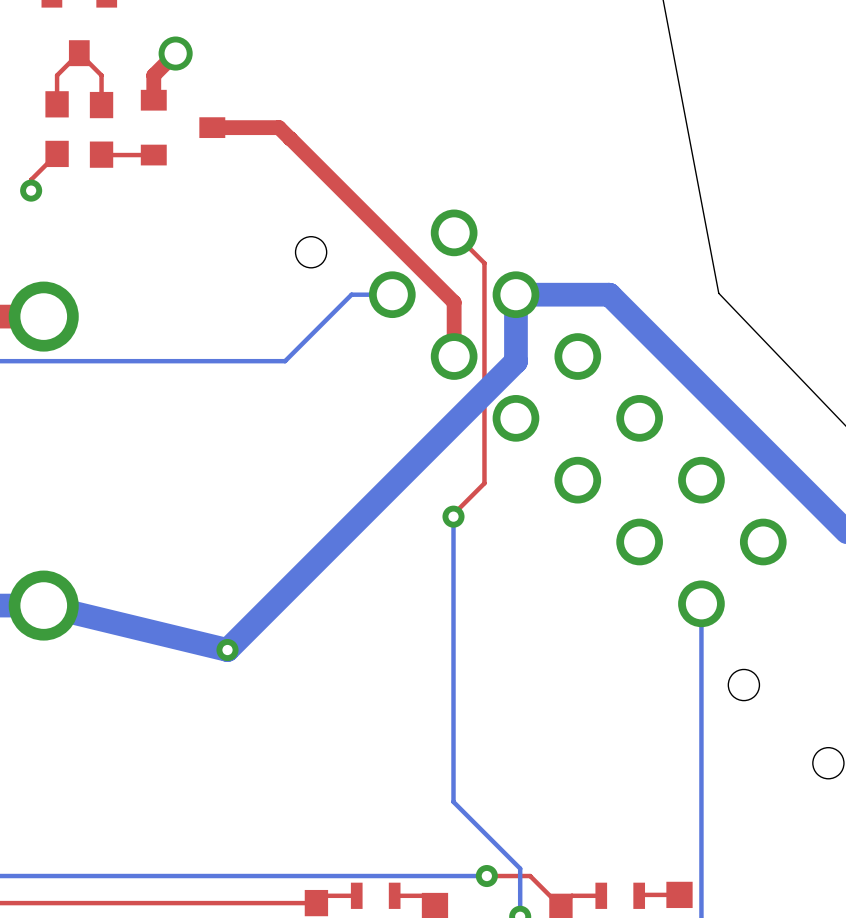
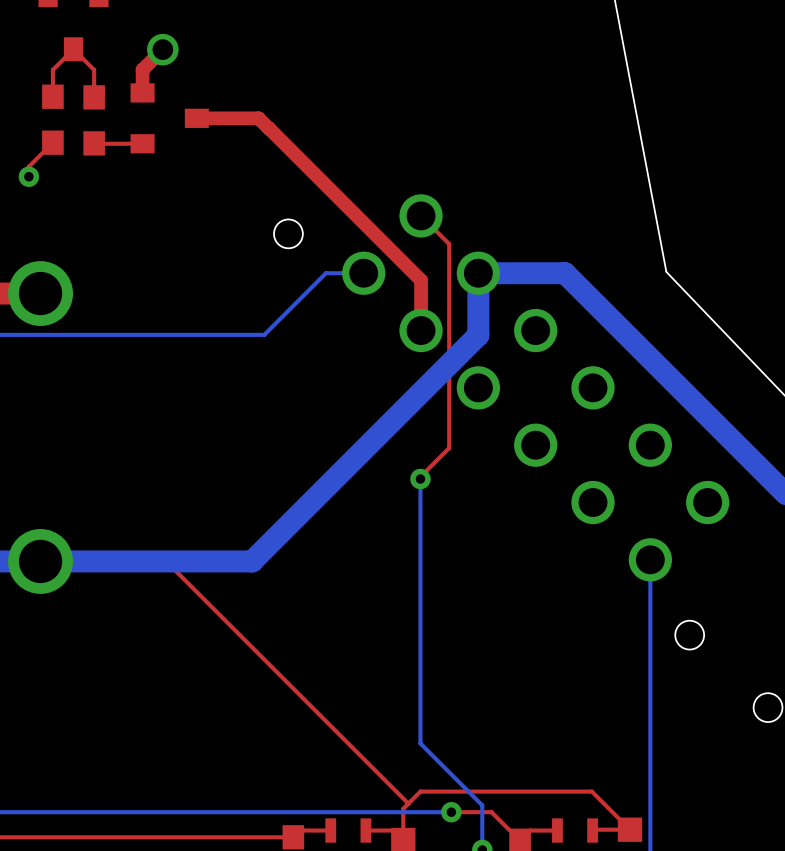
top track: none -> (40, 561) (166, 561) (408, 803)
bottom track: (271, 605) (227, 650) (43, 605) -> (252, 561) (40, 561)
via: (227, 650) -> none
top track: none -> (629, 829) (591, 791) (420, 791) (403, 808) (403, 840)

